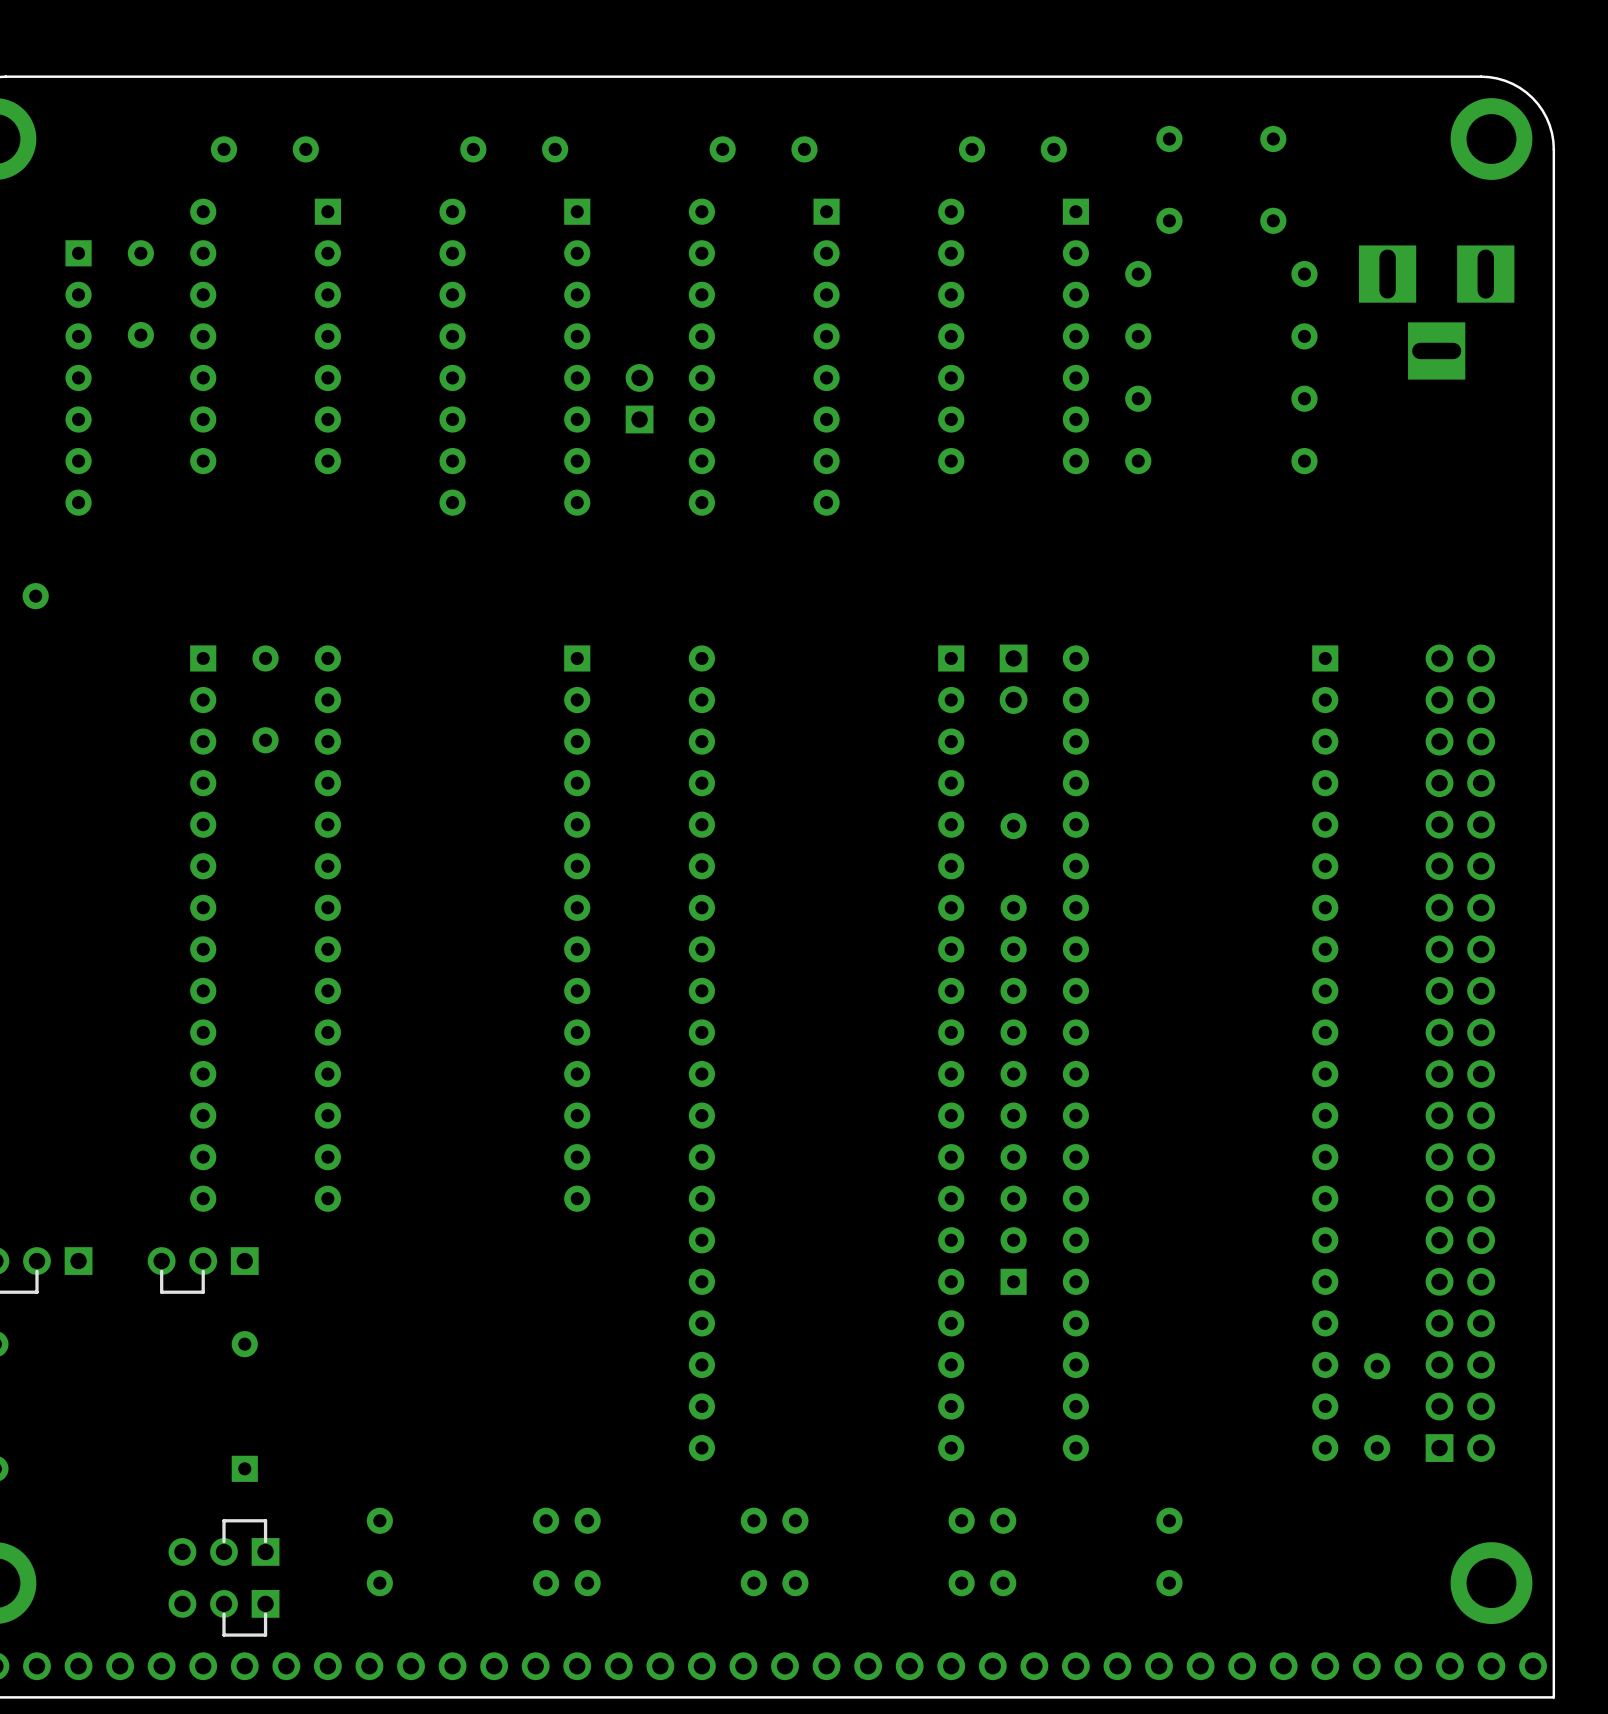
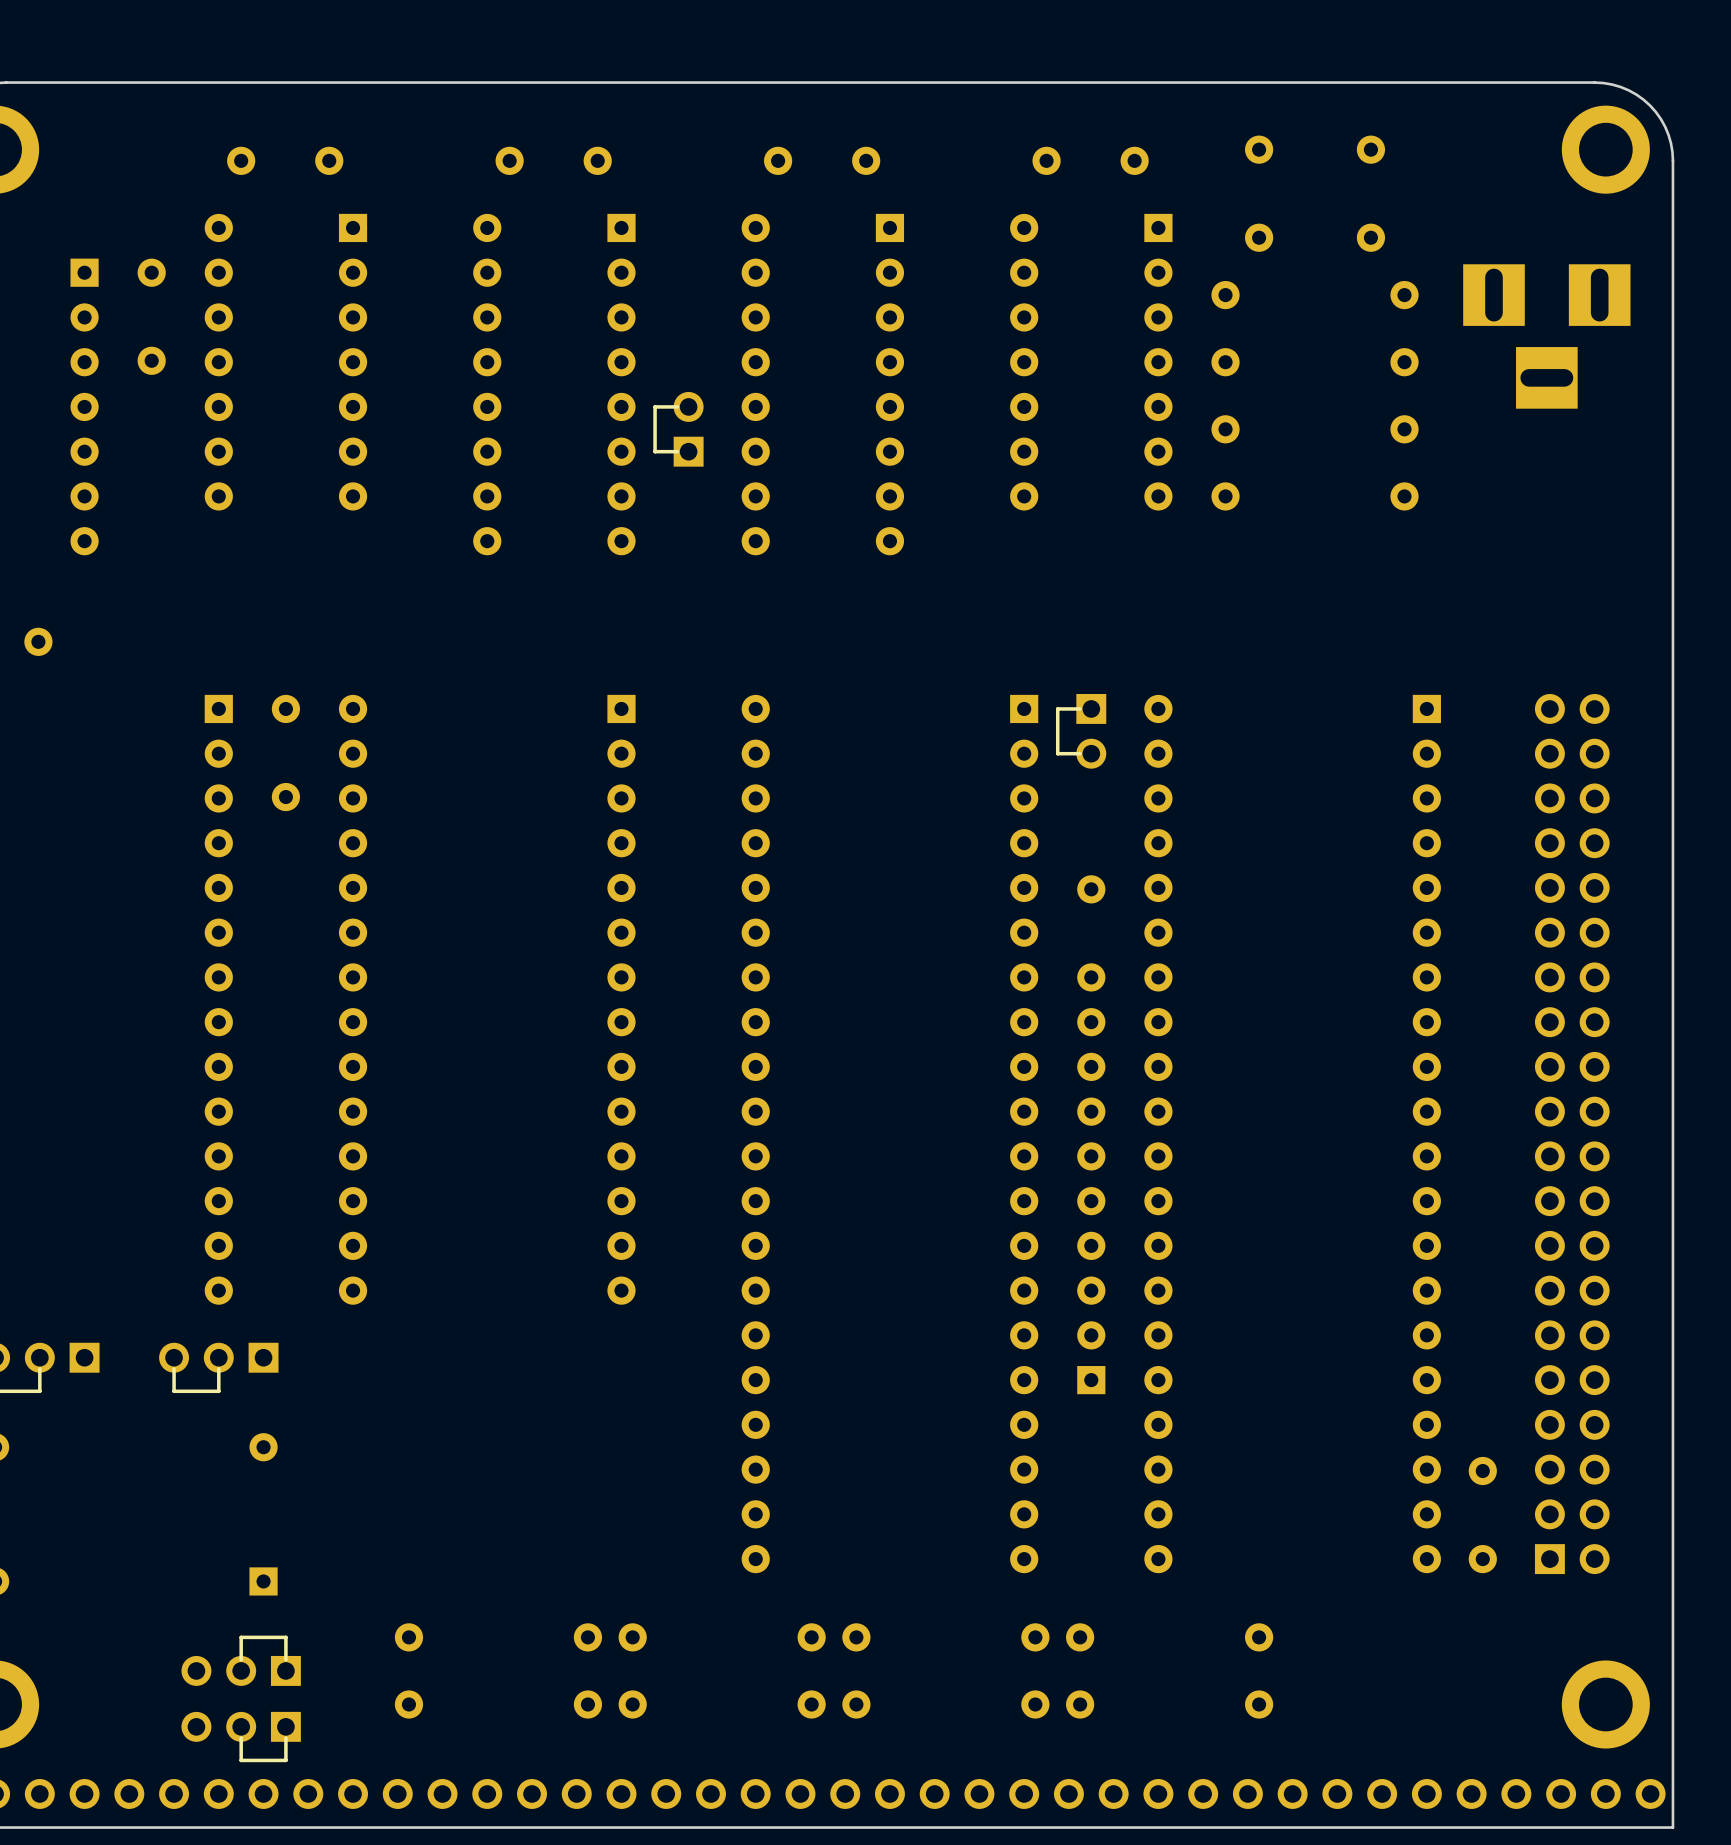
line: none -> (677, 406) (655, 406) (655, 451) (677, 451)
line: none -> (1080, 708) (1057, 708) (1057, 753) (1080, 753)

